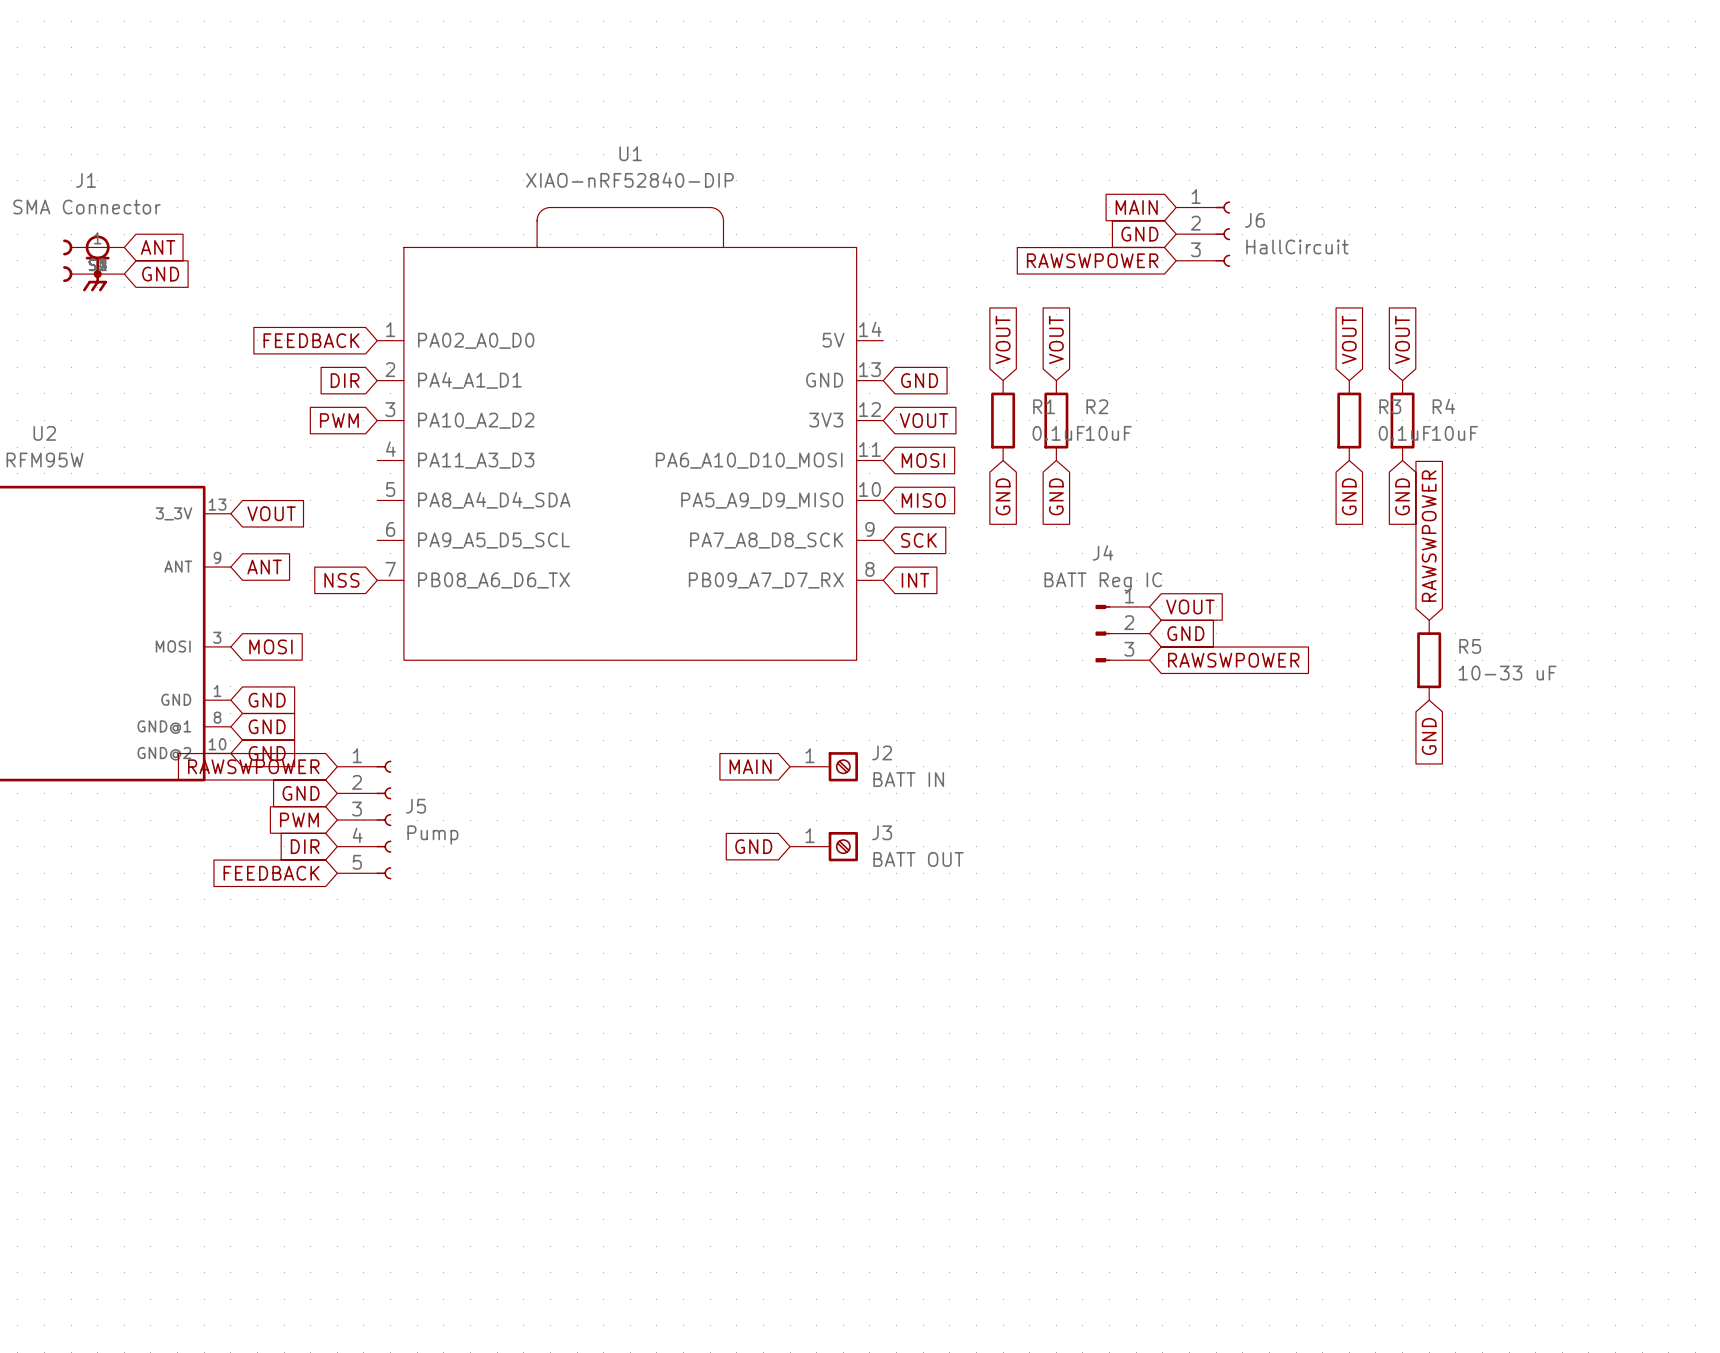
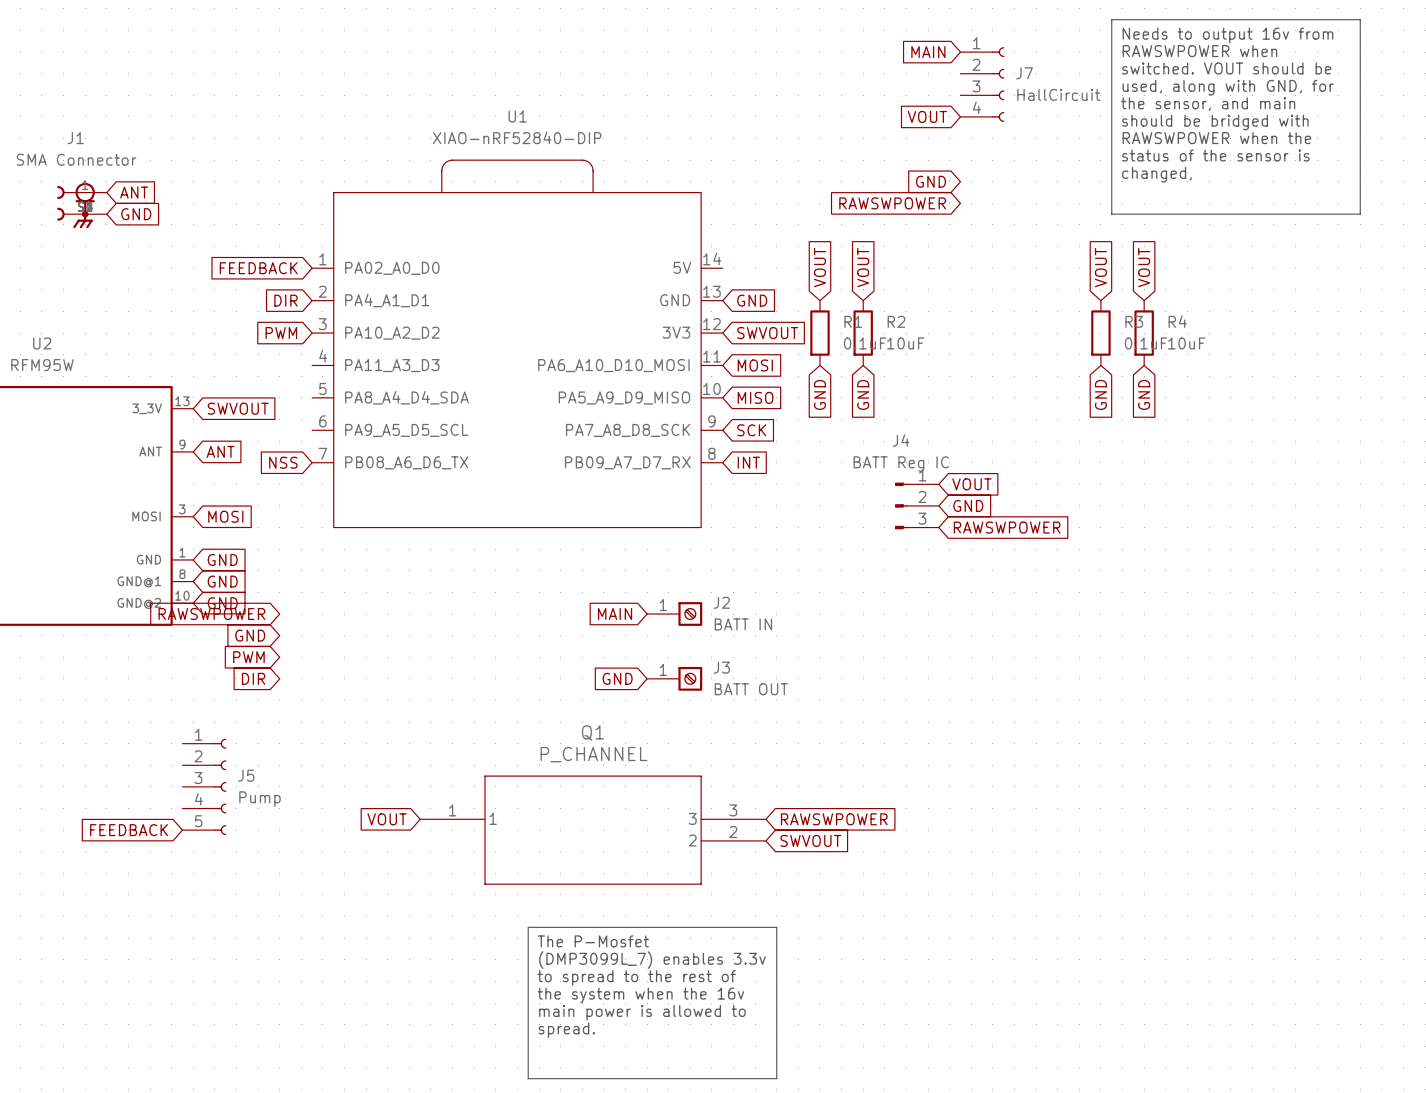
line: none -> (1111, 19) (1360, 19) (1360, 214) (1111, 214) (1111, 19)
text: none -> Needs to output 16v from (1227, 35)
text: none -> RAWSWPOWER when (1199, 51)
text: none -> switched. VOUT should be (1226, 68)
J7: none -> HallCircuit (982, 84)
text: none -> used, along with GND, for (1228, 87)
text: none -> the sensor, and main (1208, 104)
global label: none -> VOUT (927, 116)
text: none -> should be bridged with (1215, 122)
text: none -> RAWSWPOWER when the (1216, 138)
text: none -> status of the sensor is (1215, 155)
global label position: MAIN (1136, 207) -> MAIN (928, 52)
text: none -> changed, (1156, 174)
J6: HallCircuit (1203, 234) -> none
global label: VOUT (924, 420) -> SWVOUT (767, 333)
global label: VOUT (271, 513) -> SWVOUT (238, 408)
global label: RAWSWPOWER (1429, 536) -> none
R5: 10-33 uF (1429, 660) -> none
global label: GND (1429, 736) -> none
J5 position: (364, 820) -> (204, 786)
global label position: FEEDBACK (271, 873) -> FEEDBACK (129, 830)
global label: none -> VOUT (387, 819)
global label: none -> RAWSWPOWER (834, 819)
Q1: none -> P_CHANNEL (593, 830)
global label: none -> SWVOUT (810, 840)
line: none -> (528, 927) (776, 927) (776, 1078) (528, 1078) (528, 927)
text: none -> The P-Mosfet (593, 941)
text: none -> (DMP3099L_7) enables 3.3v (652, 960)
text: none -> to spread to the rest of (636, 977)
text: none -> the system when the 16v (640, 995)
text: none -> main power is allowed to (642, 1012)
text: none -> spread. (566, 1030)

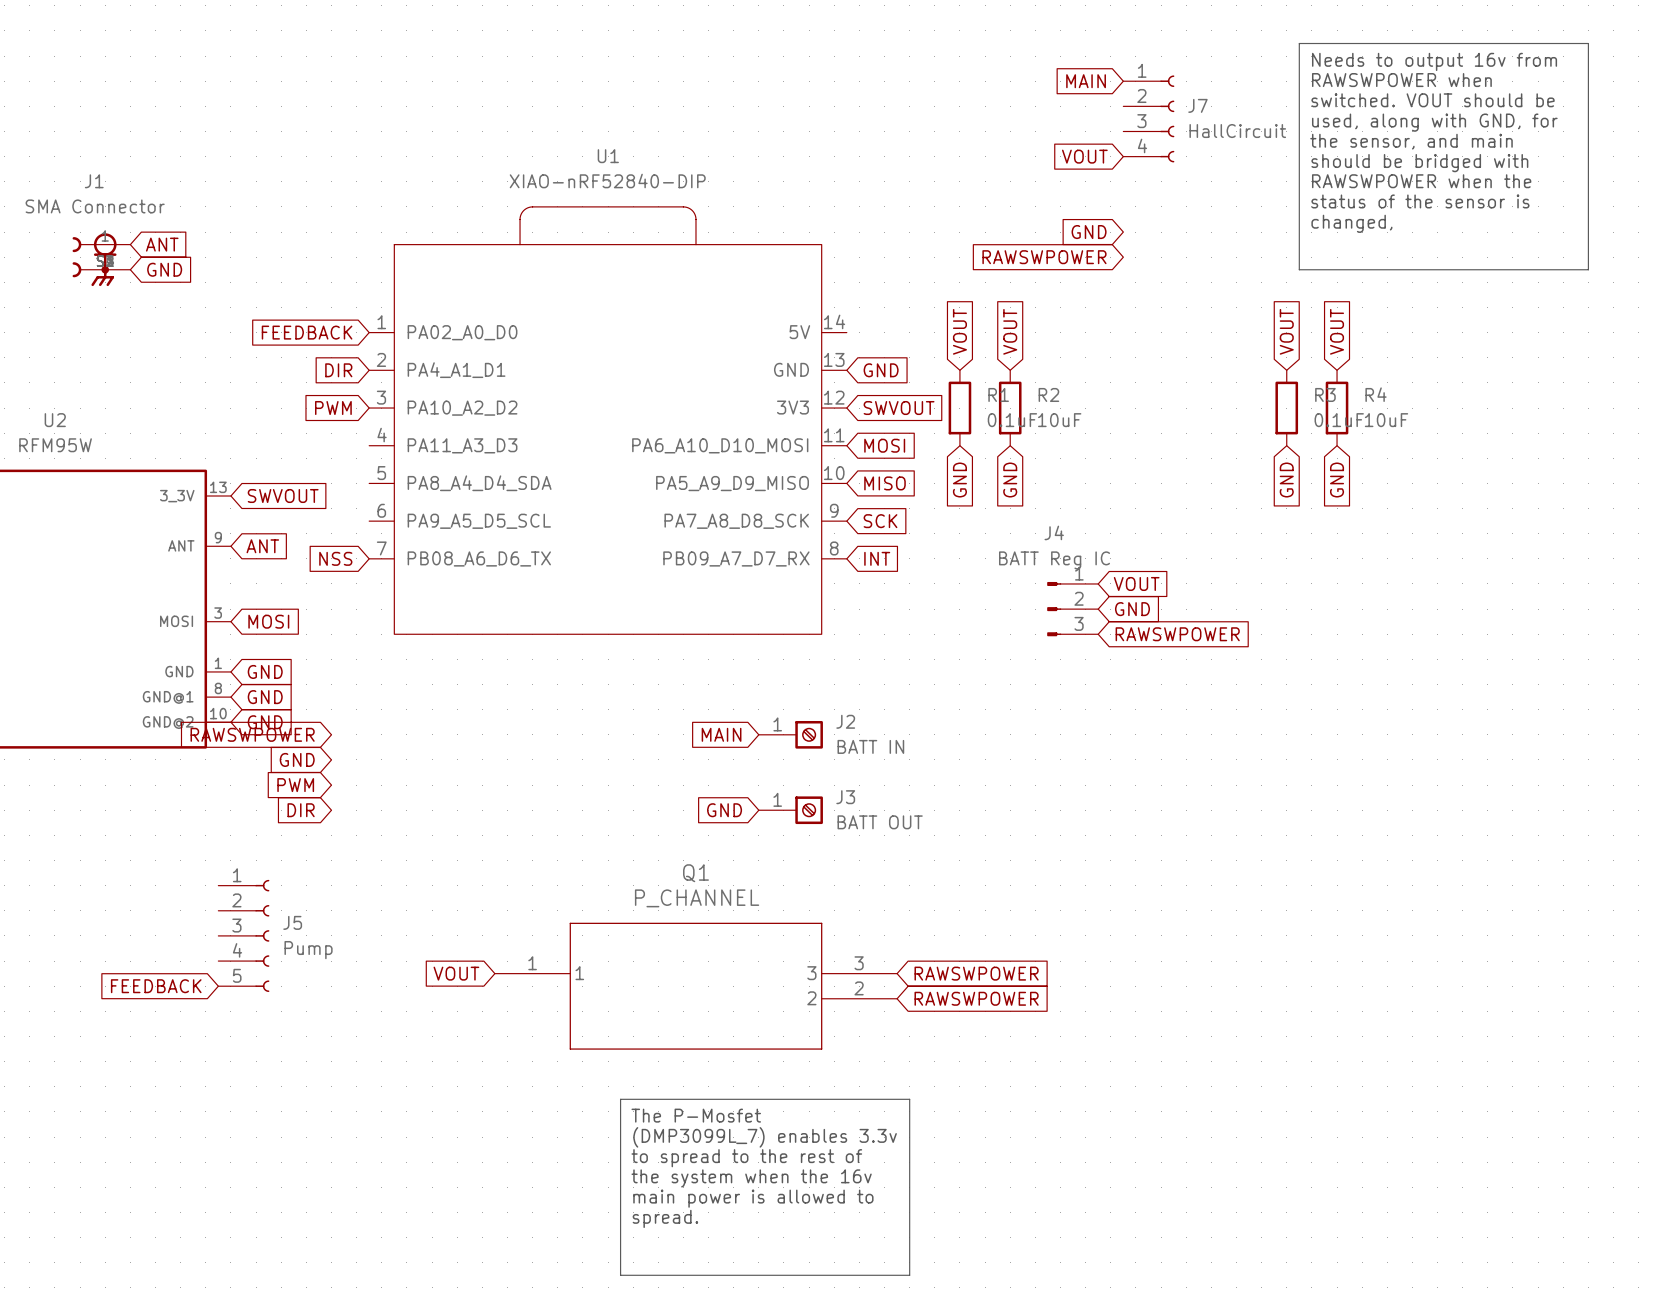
global label: SWVOUT (810, 840) -> RAWSWPOWER (976, 998)

